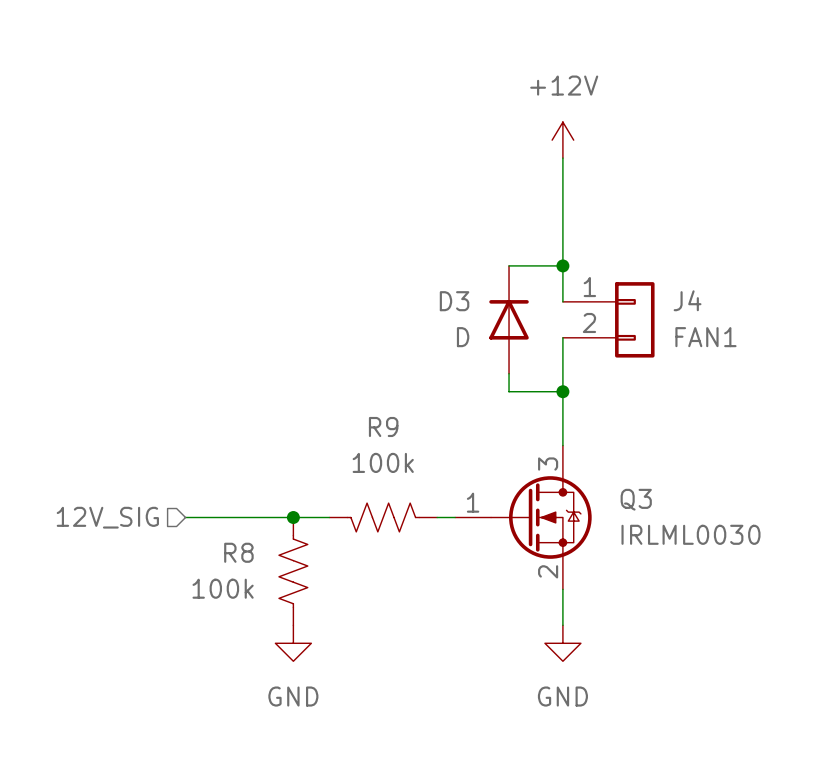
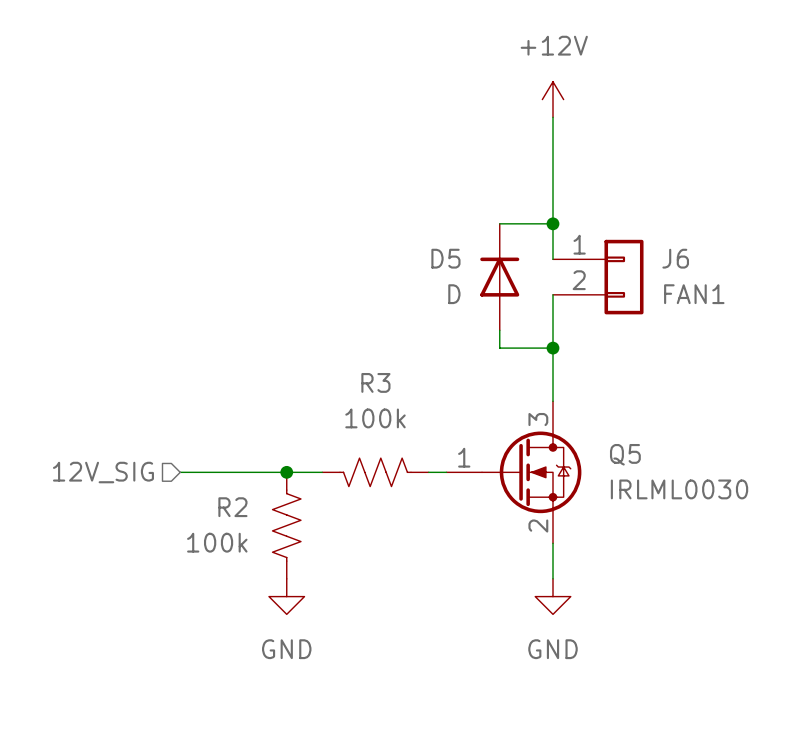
J4 name: J4 (687, 300) -> J6 (675, 258)
D3 name: D3 (454, 301) -> D5 (445, 258)
R9 name: R9 (383, 426) -> R3 (375, 382)
Q3 name: Q3 (636, 499) -> Q5 (625, 454)
R8 name: R8 (238, 552) -> R2 (232, 507)

